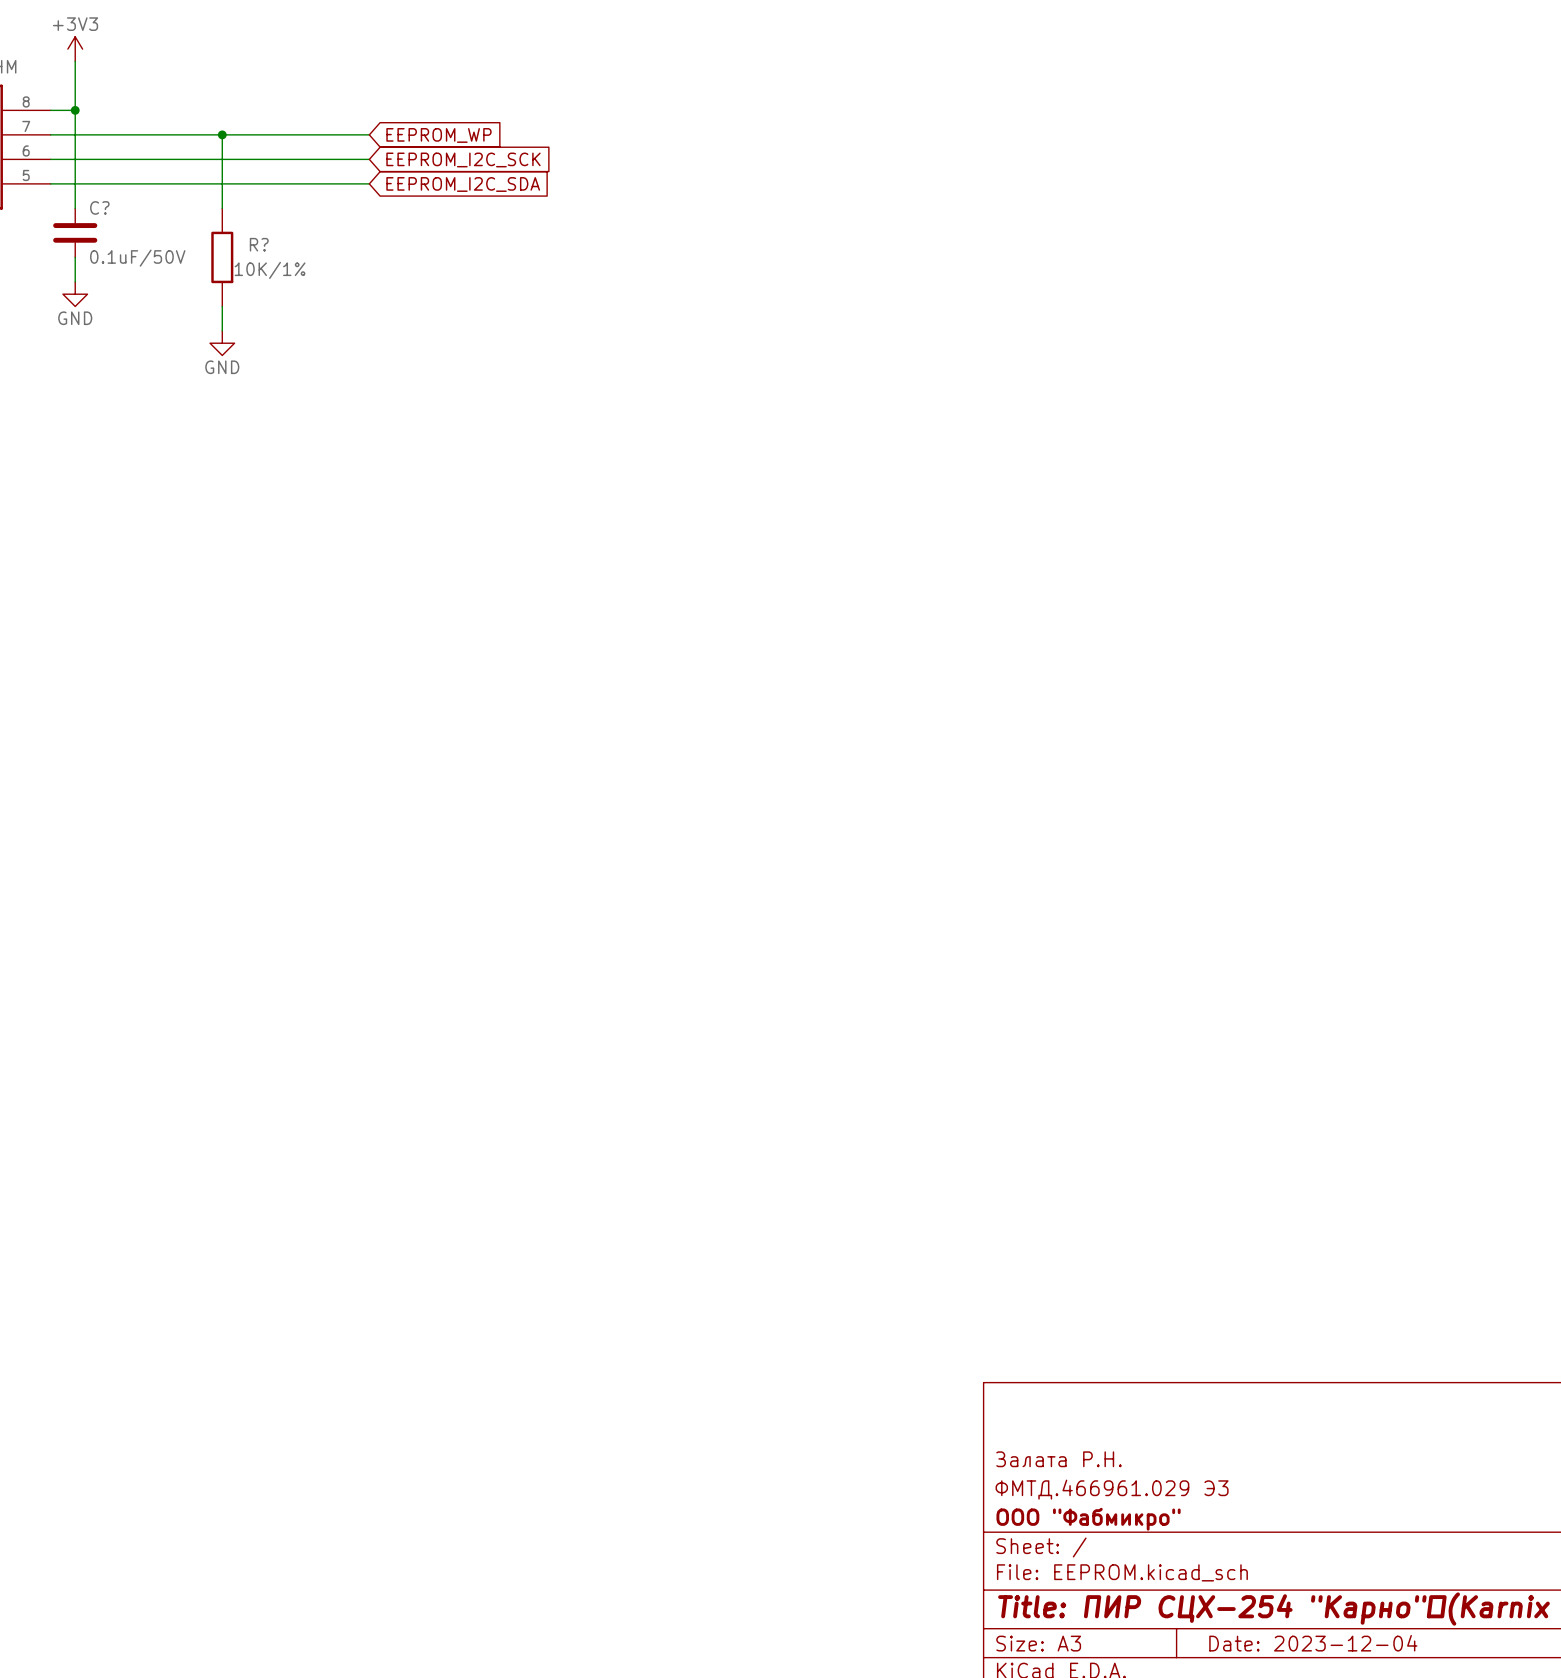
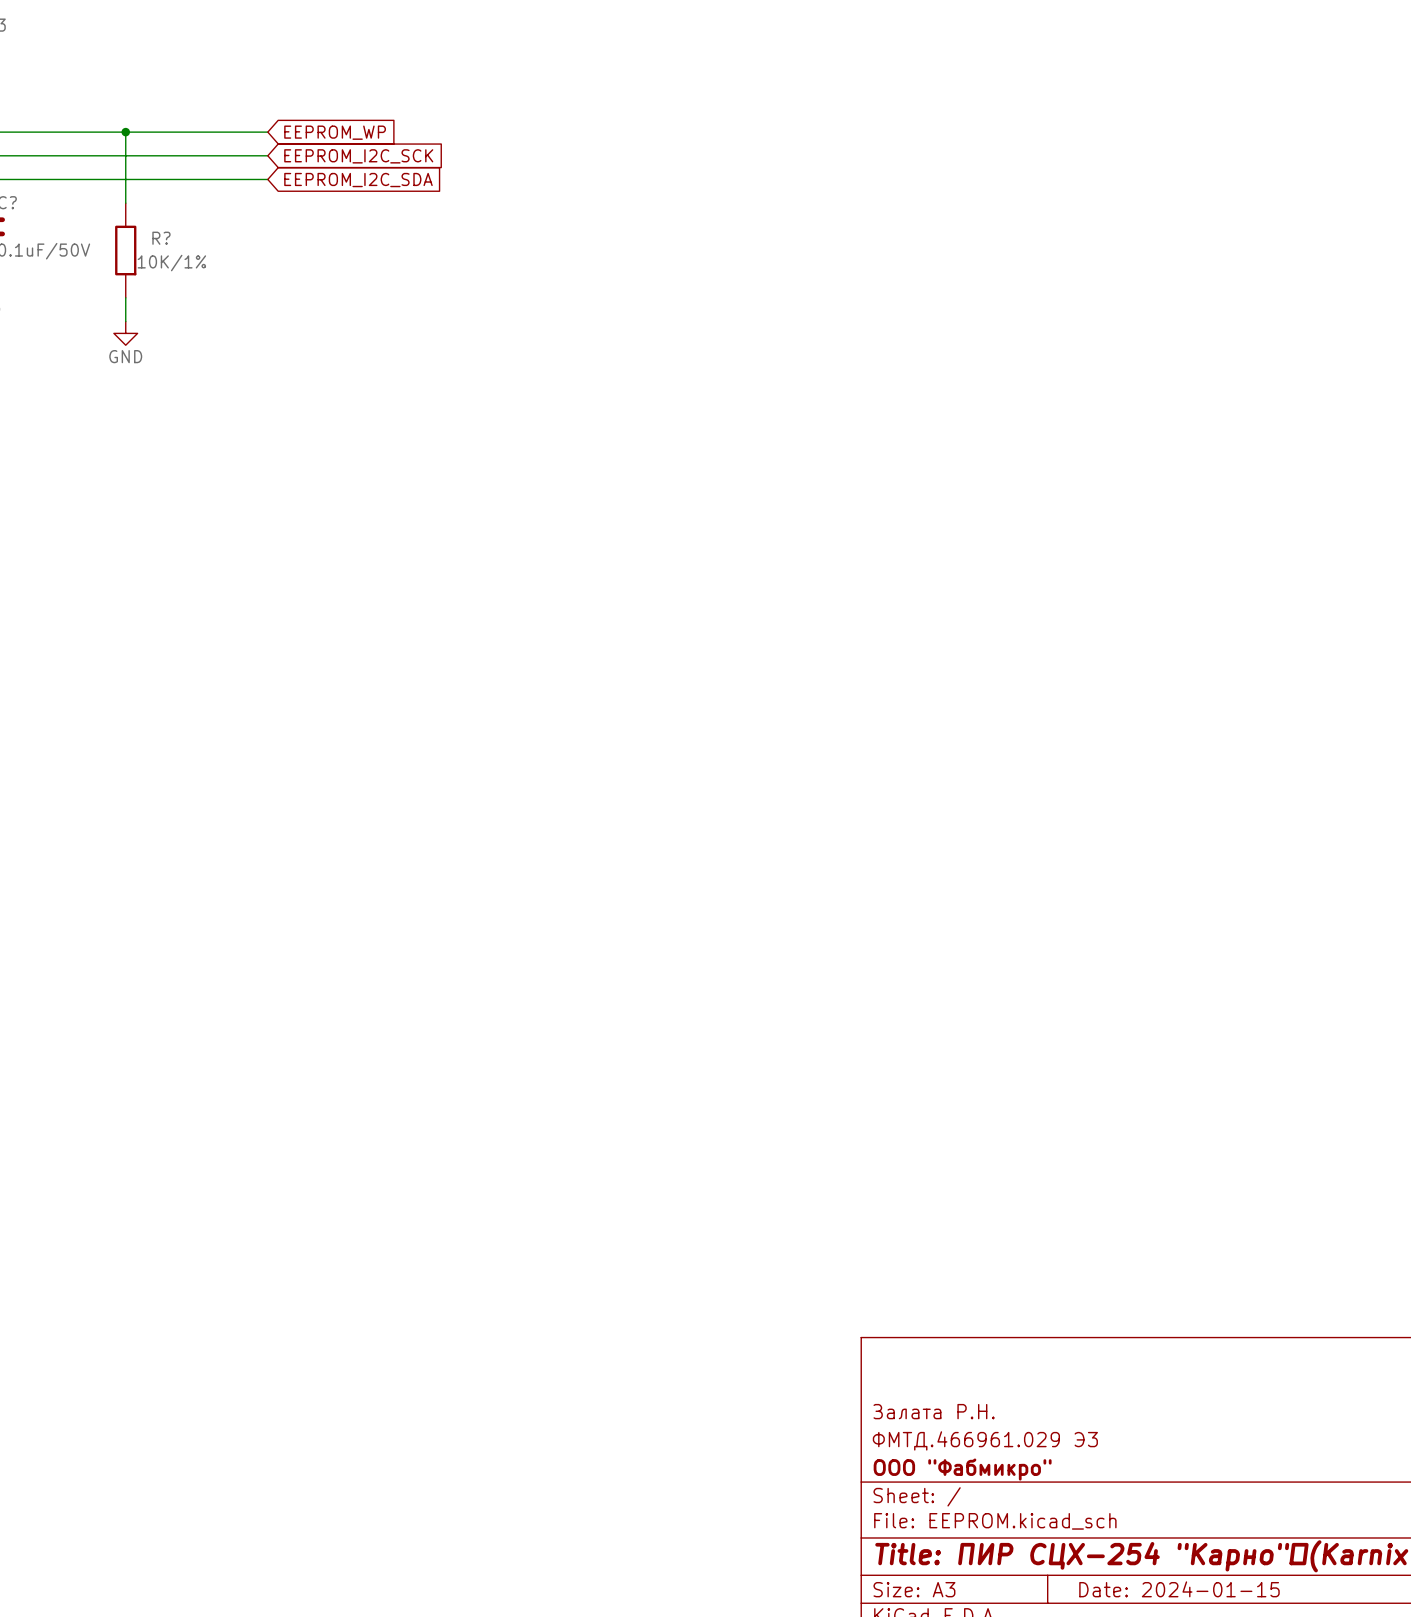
title block: Date: 2023-12-04 (1313, 1643) -> Date: 2024-01-15 (1179, 1589)

